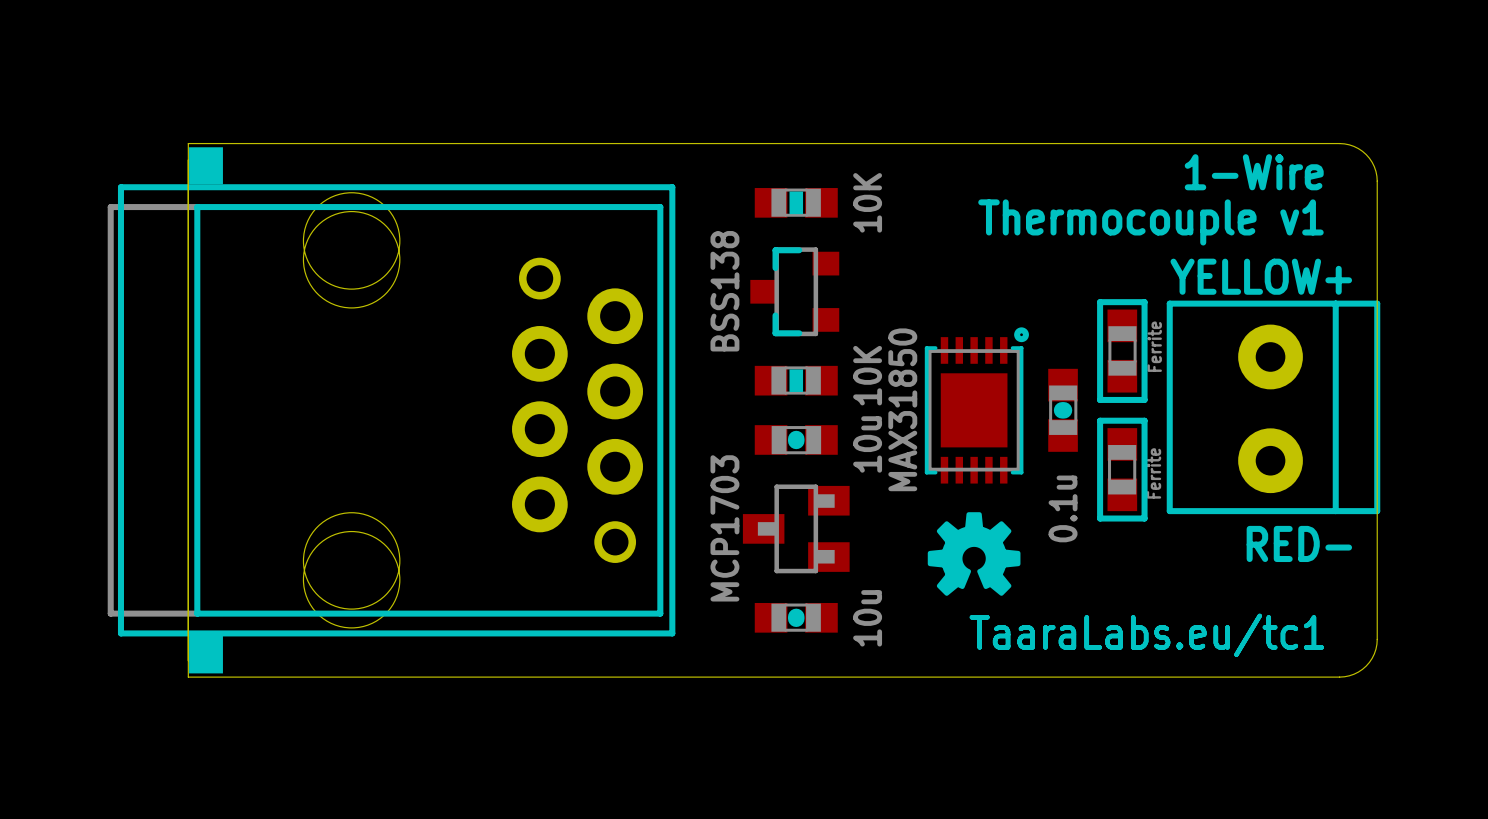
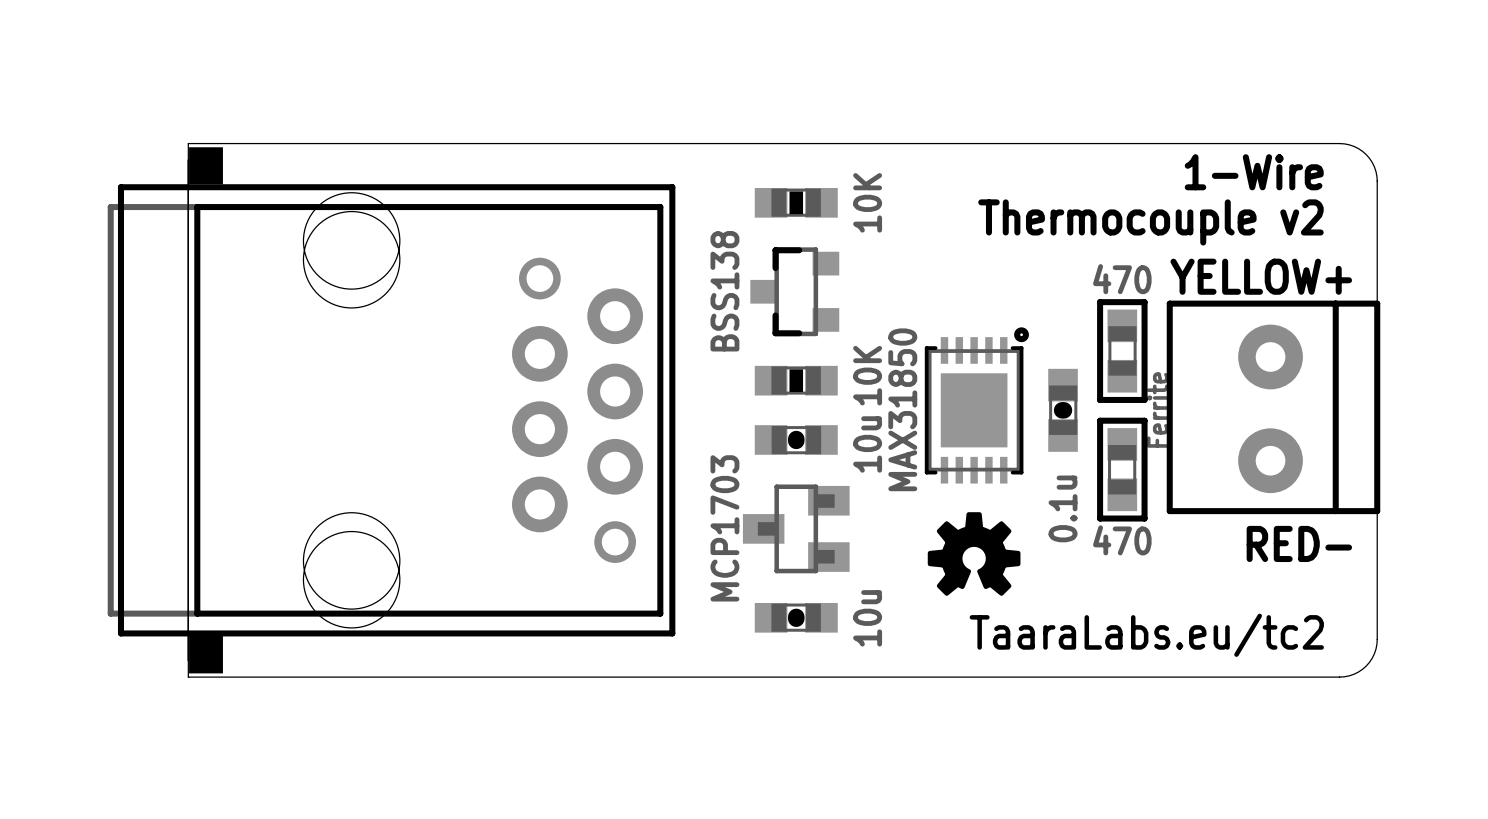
text: Thermocouple v1 (1150, 222) -> Thermocouple v2 (1150, 222)
part value: Ferrite (1154, 346) -> 470 (1122, 279)
text: none -> Ferrite (1157, 409)
part value: Ferrite (1153, 473) -> 470 (1122, 540)
text: TaaraLabs.eu/tc1 (1146, 635) -> TaaraLabs.eu/tc2 (1146, 635)

